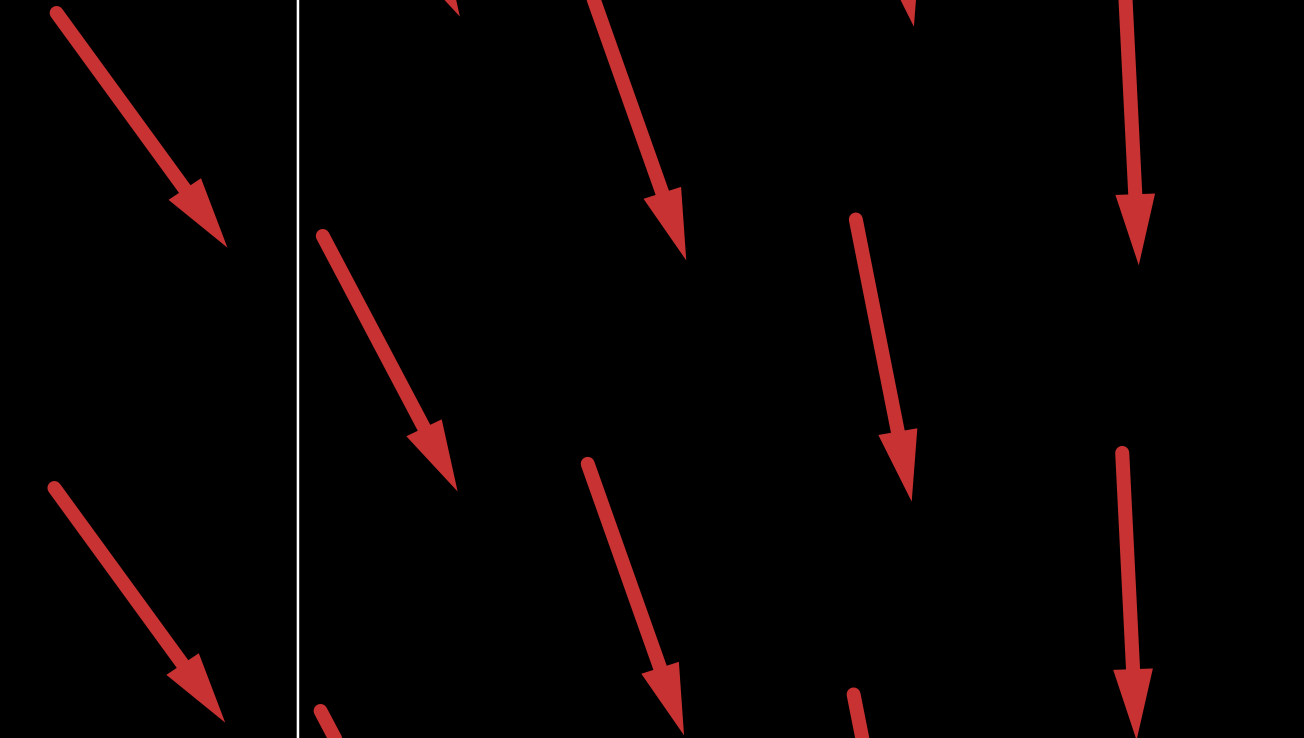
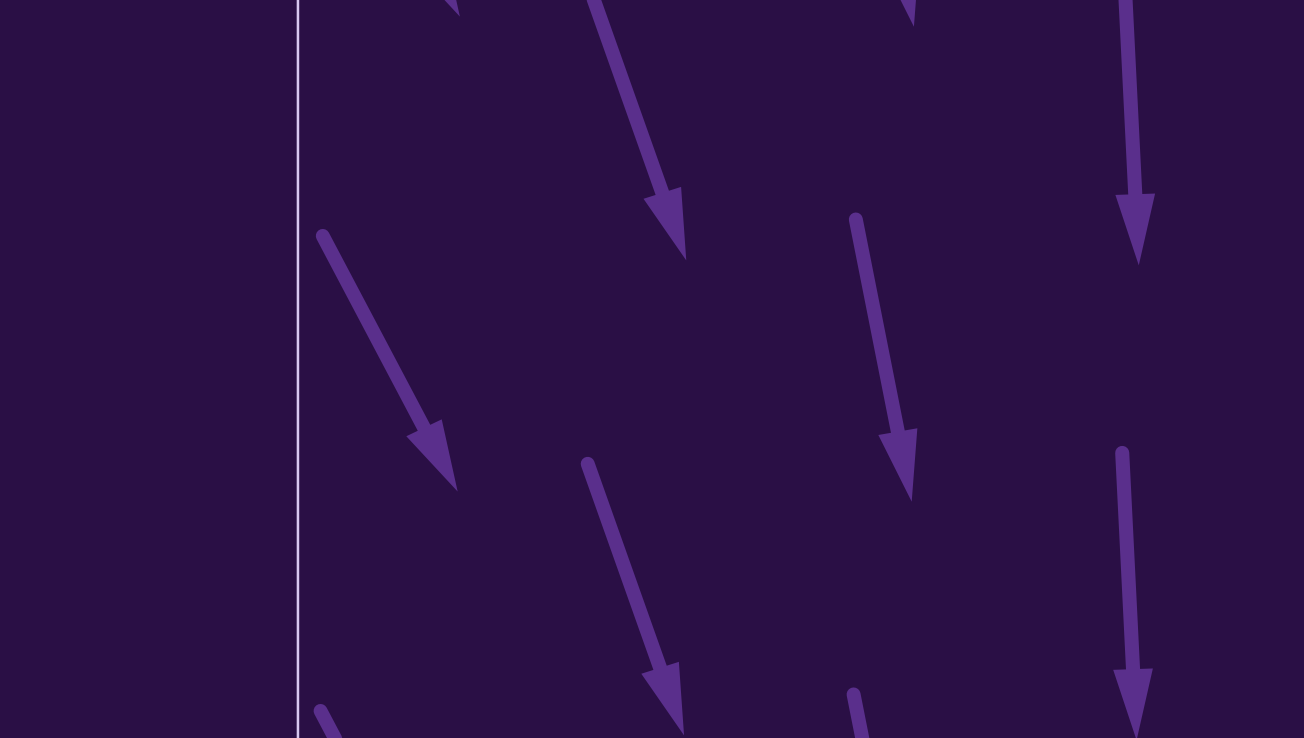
track: (56, 12) (192, 199) -> none
drawing: [168, 178, 228, 248] -> none
track: (54, 487) (190, 674) -> none
drawing: [166, 653, 226, 723] -> none

